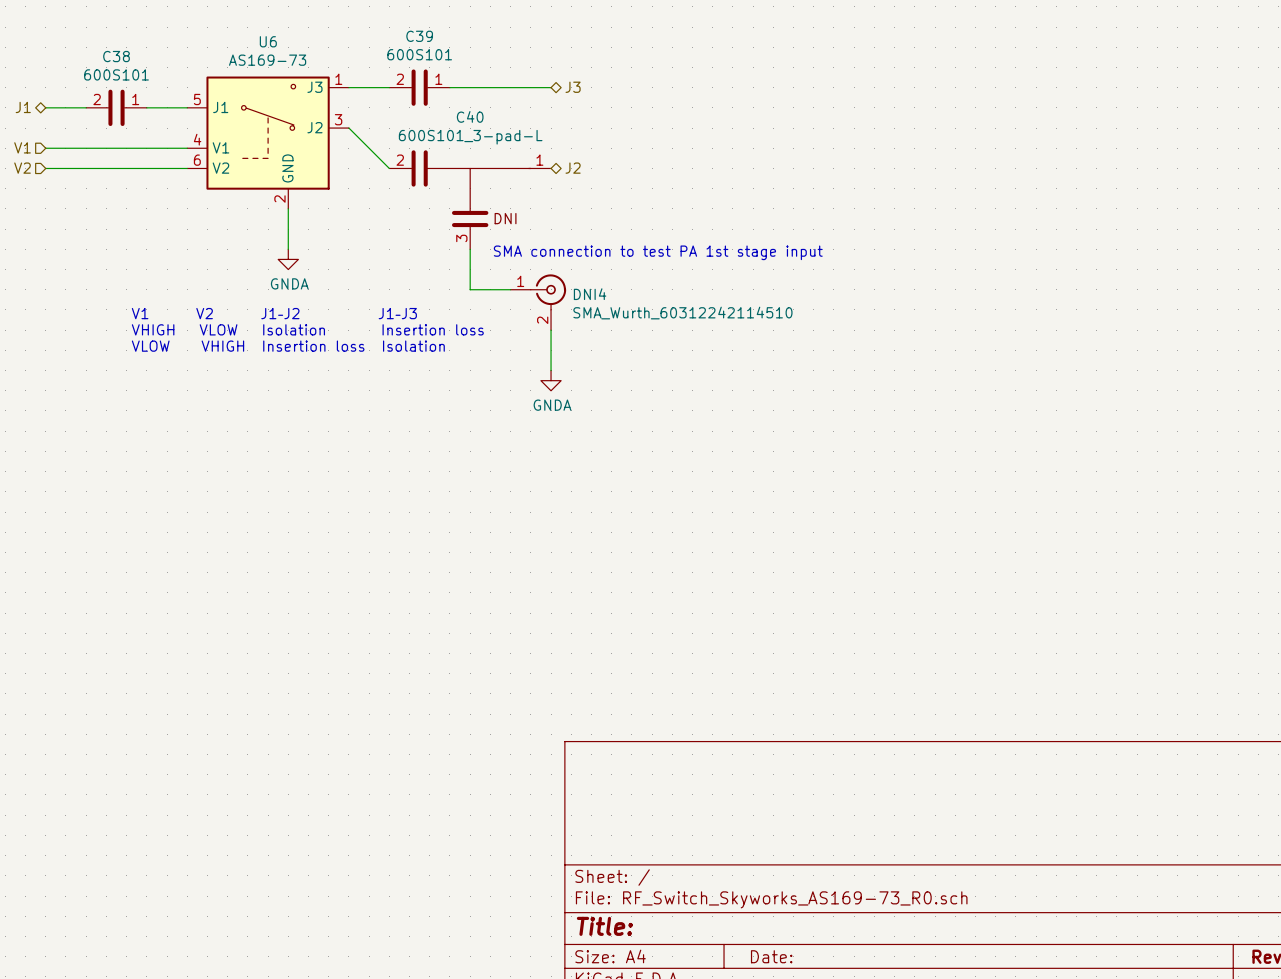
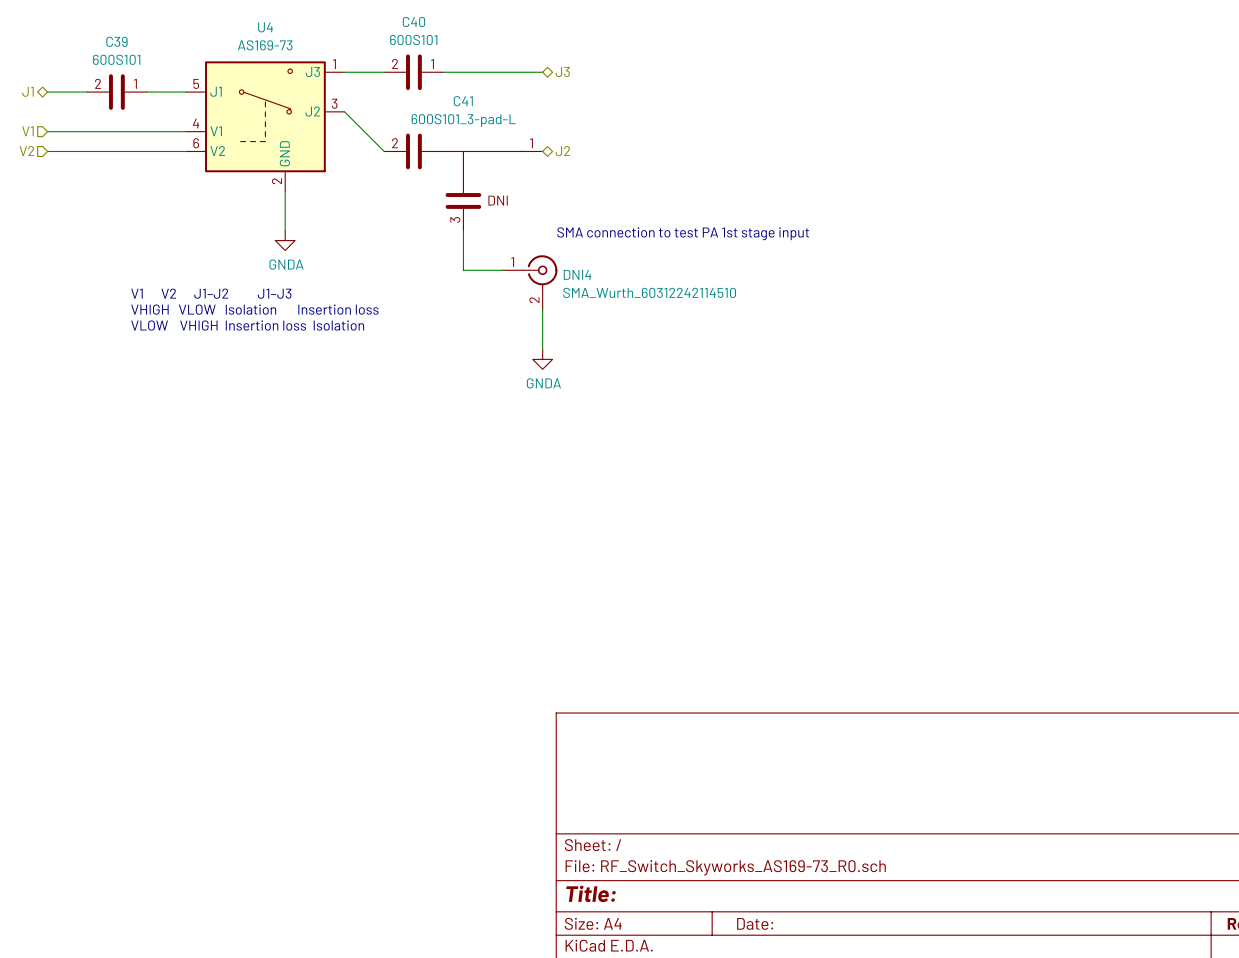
C39 name: C39 (419, 36) -> C40 (413, 21)
U6 name: U6 (268, 41) -> U4 (265, 27)
C38 name: C38 (116, 56) -> C39 (116, 41)
C40 name: C40 (470, 116) -> C41 (463, 101)

